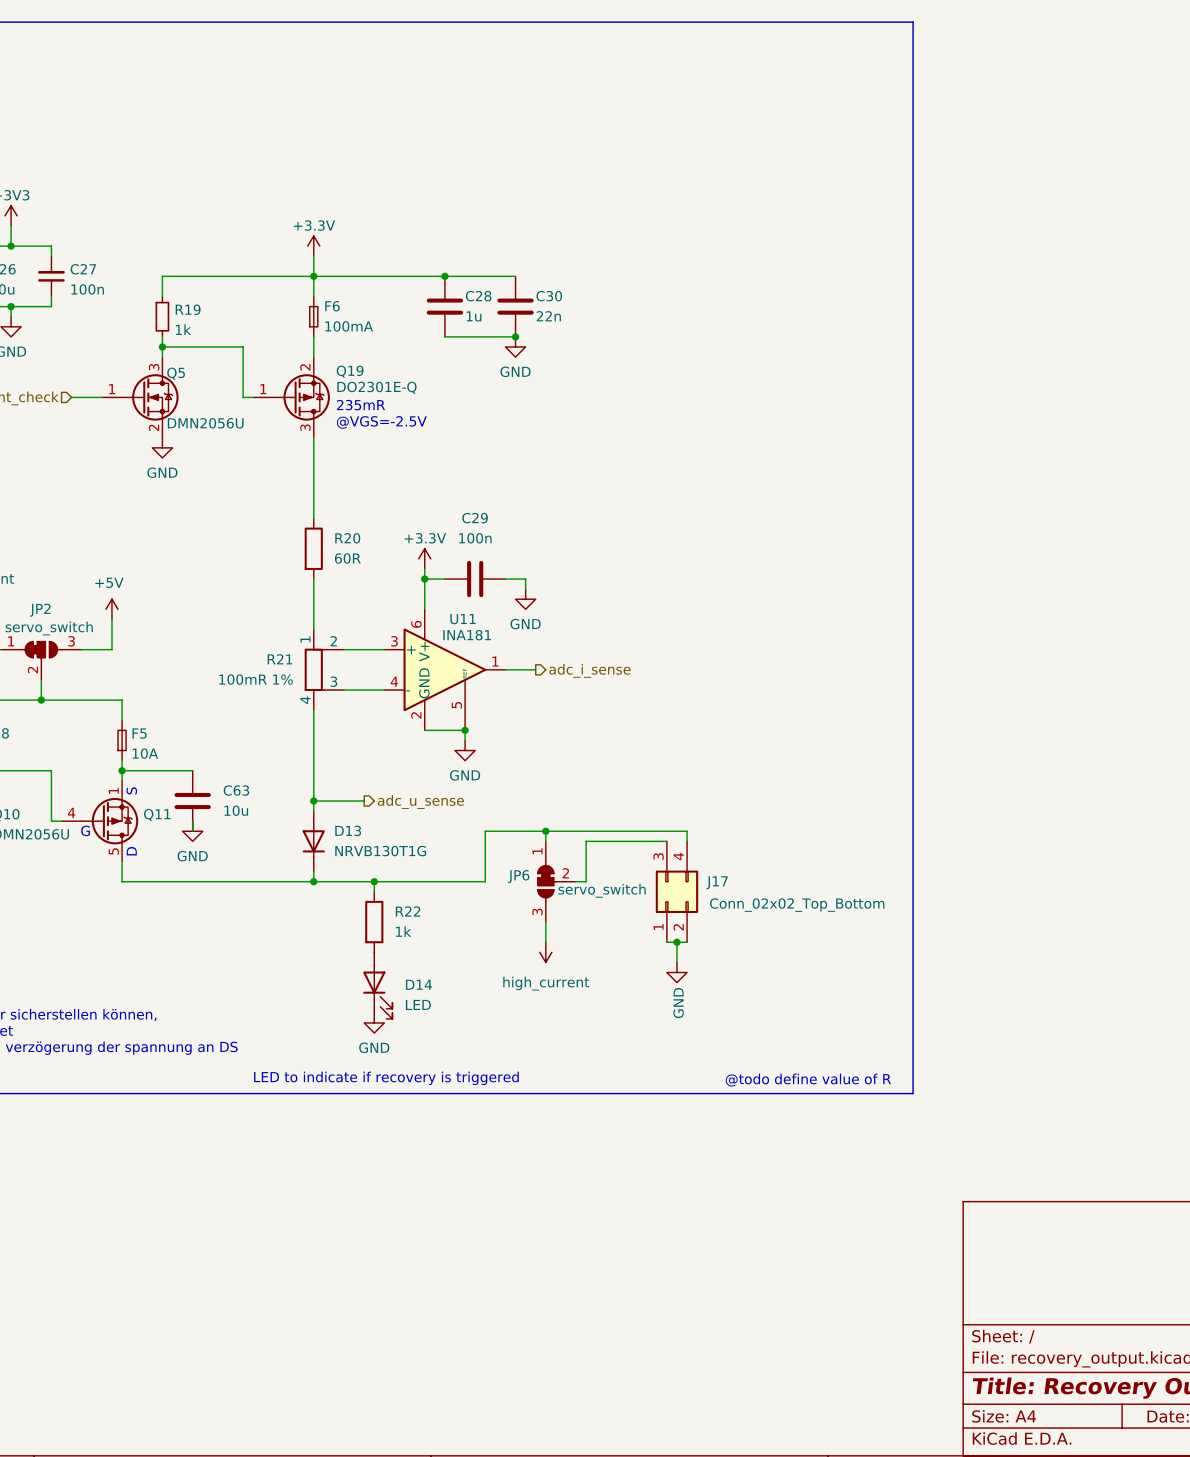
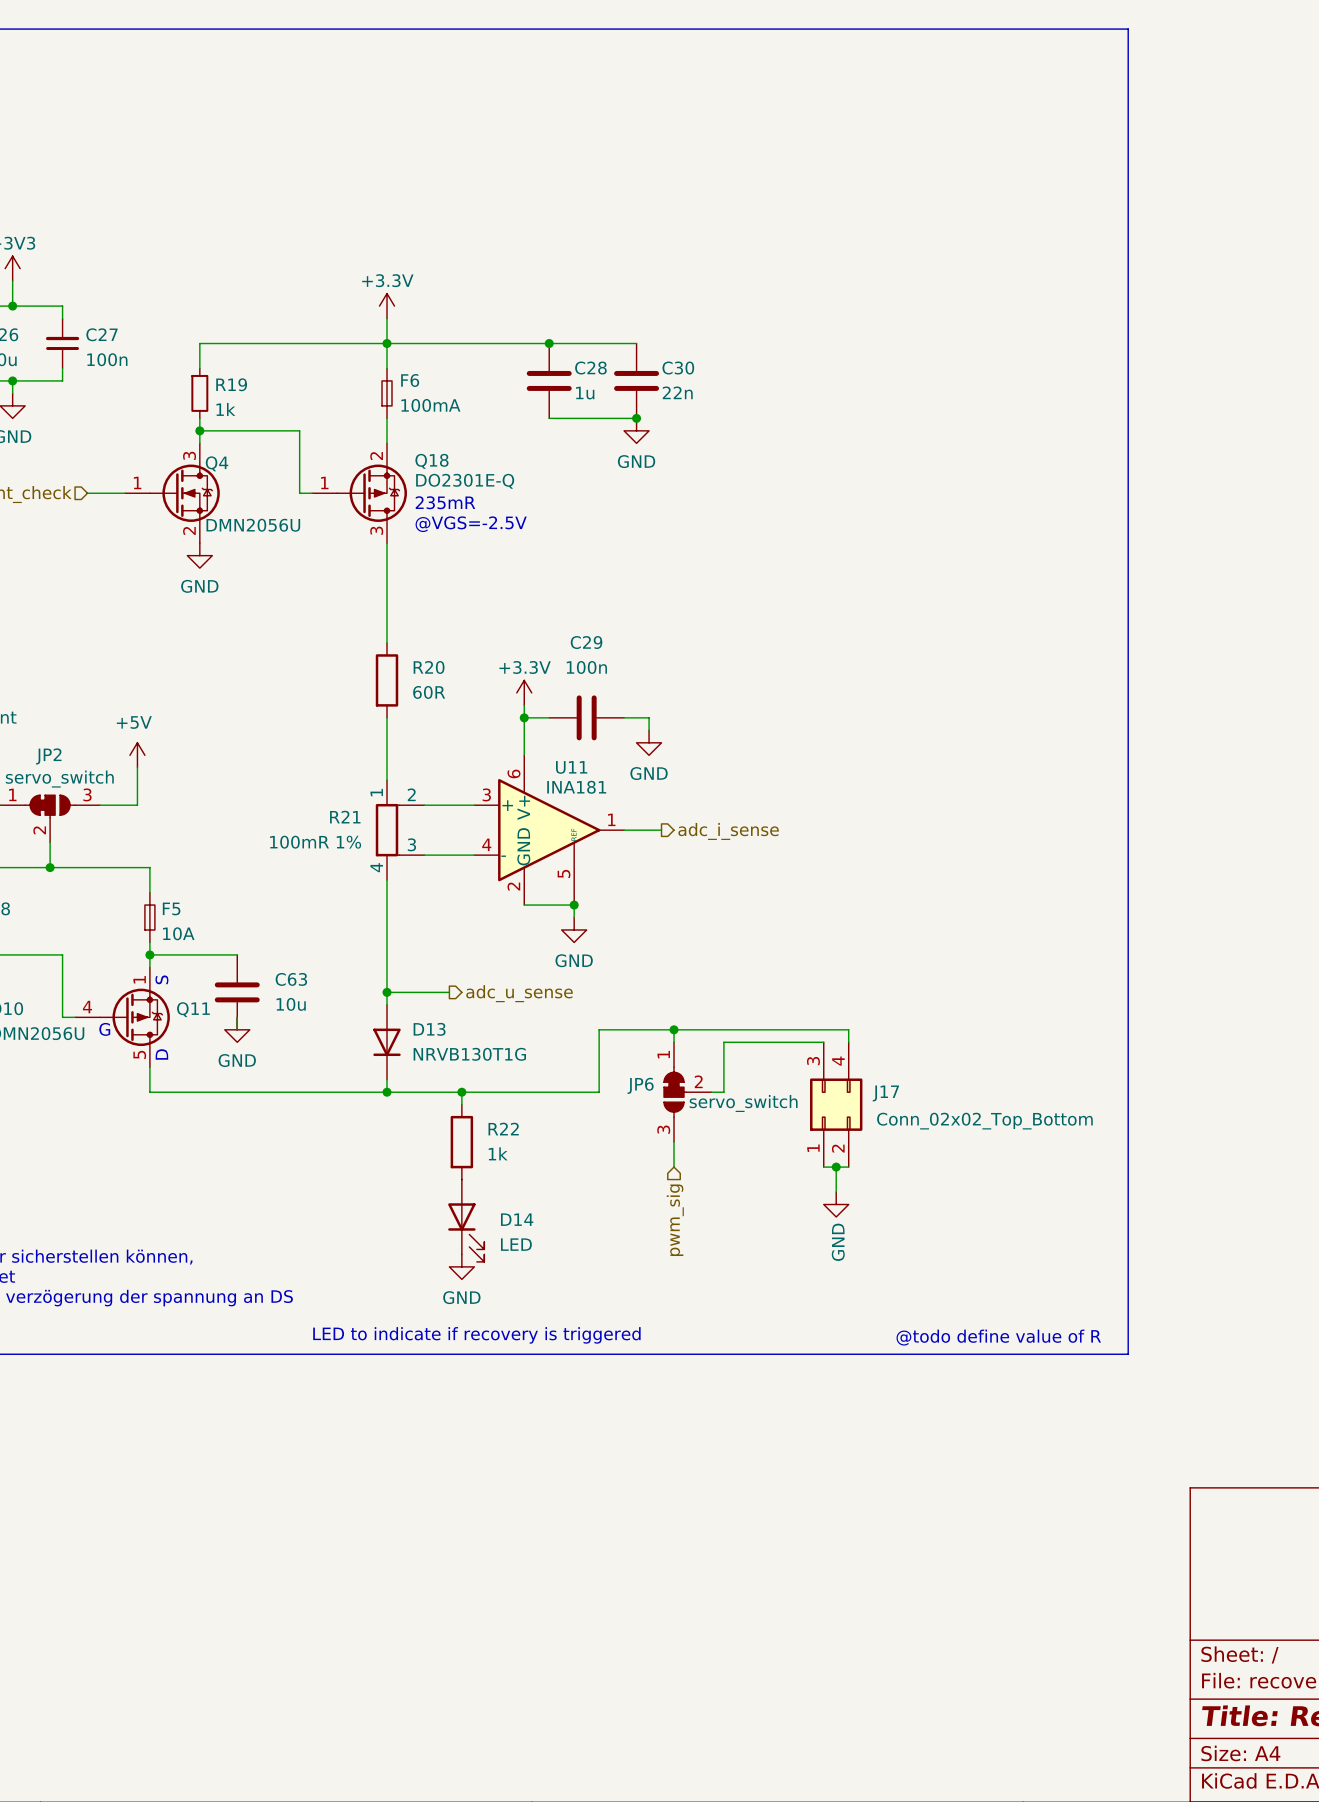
Q19 name: Q19 (350, 371) -> Q18 (431, 461)
Q5 name: Q5 (176, 373) -> Q4 (217, 463)
power symbol: high_current (545, 952) -> none
hierarchical label: none -> pwm_sig (675, 1220)

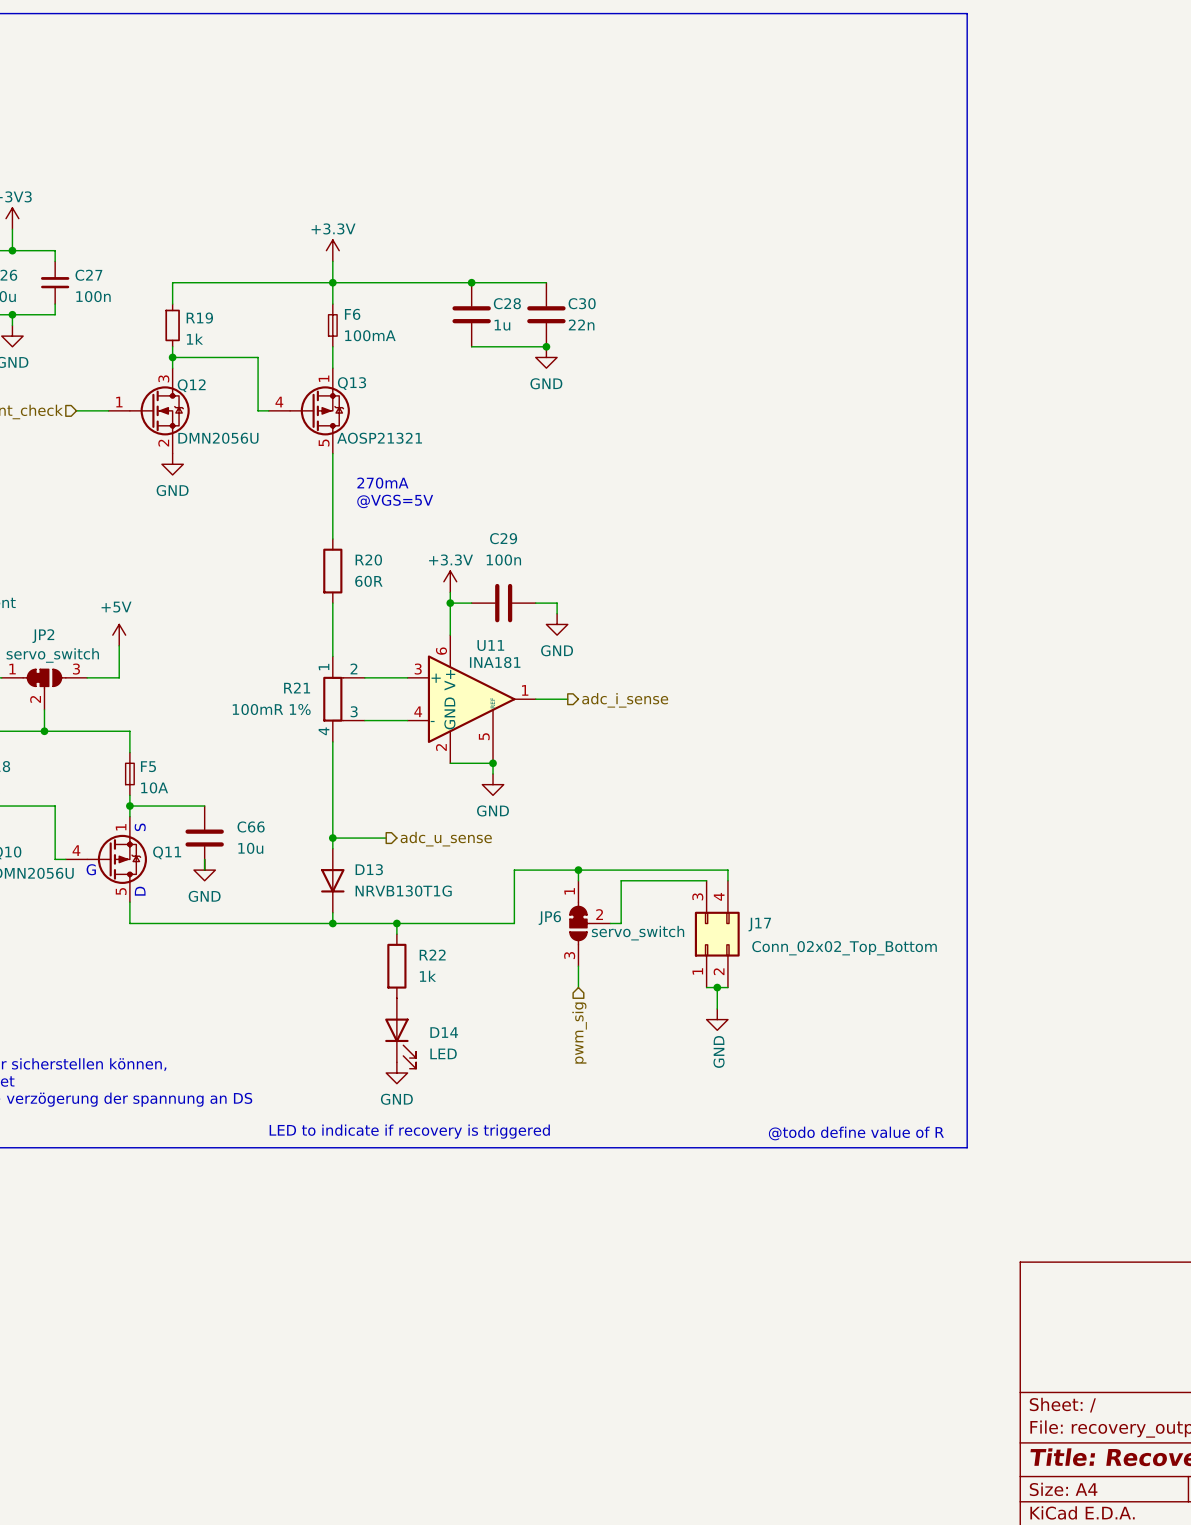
Q18 pin number: 2 (376, 456) -> 1 (324, 378)
Q18 name: Q18 (431, 461) -> Q13 (352, 383)
Q4 name: Q4 (217, 463) -> Q12 (191, 385)
Q18 value: DO2301E-Q (465, 481) -> AOSP21321 (379, 438)
Q18 pin number: 1 (324, 482) -> 4 (279, 402)
text: 235mR (445, 502) -> none
text: @VGS=-2.5V (471, 524) -> none
Q18 pin number: 3 (376, 530) -> 5 (324, 442)
text: none -> 270mA (382, 483)
text: none -> @VGS=5V (395, 501)
C63 name: C63 (291, 979) -> C66 (251, 826)

